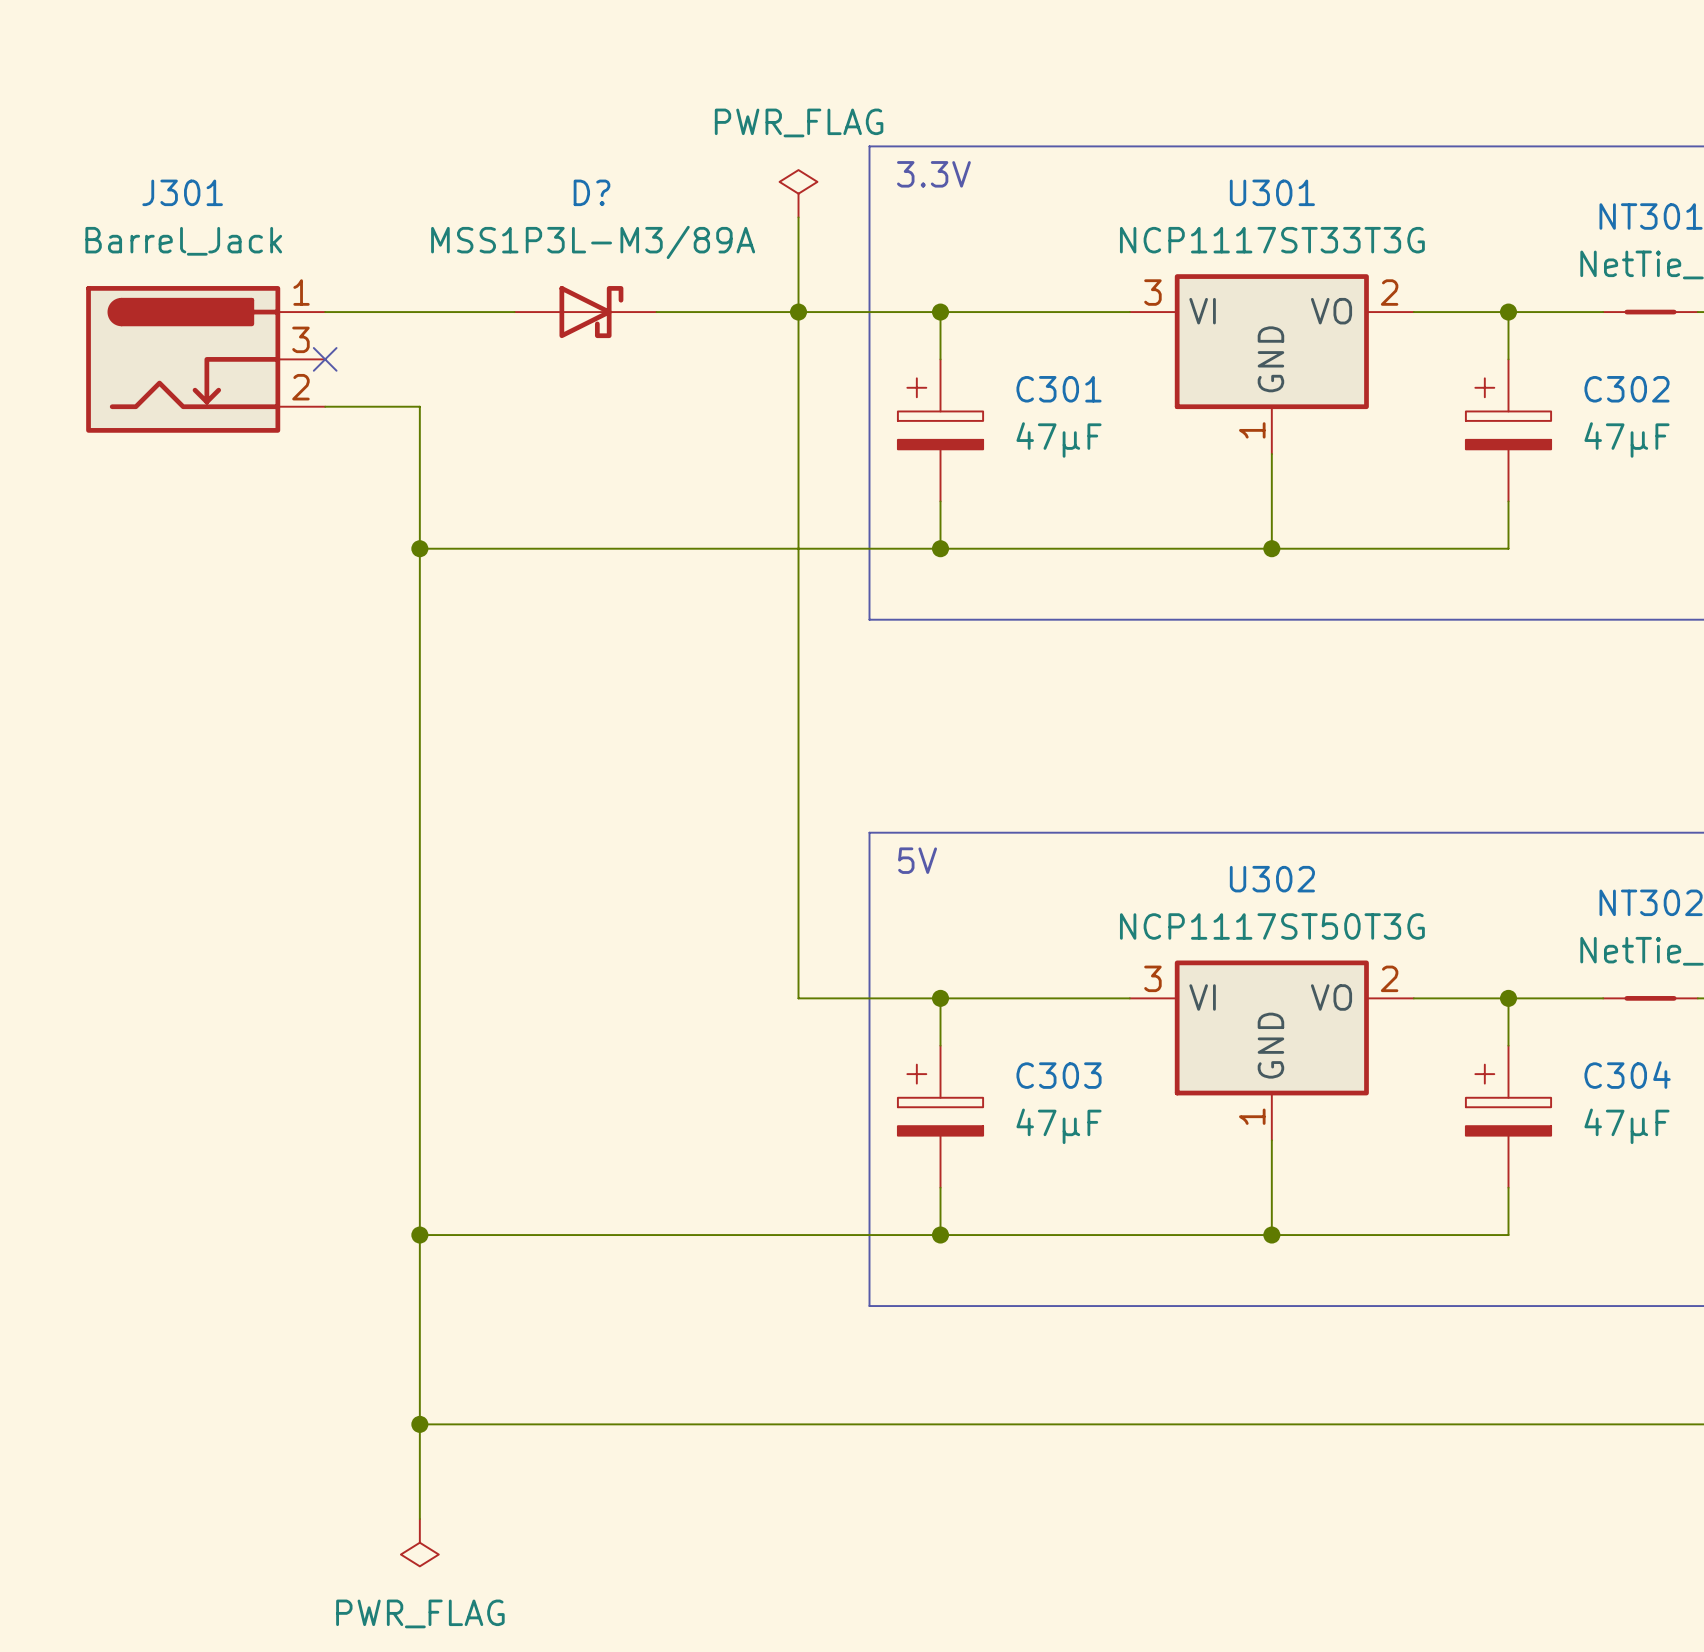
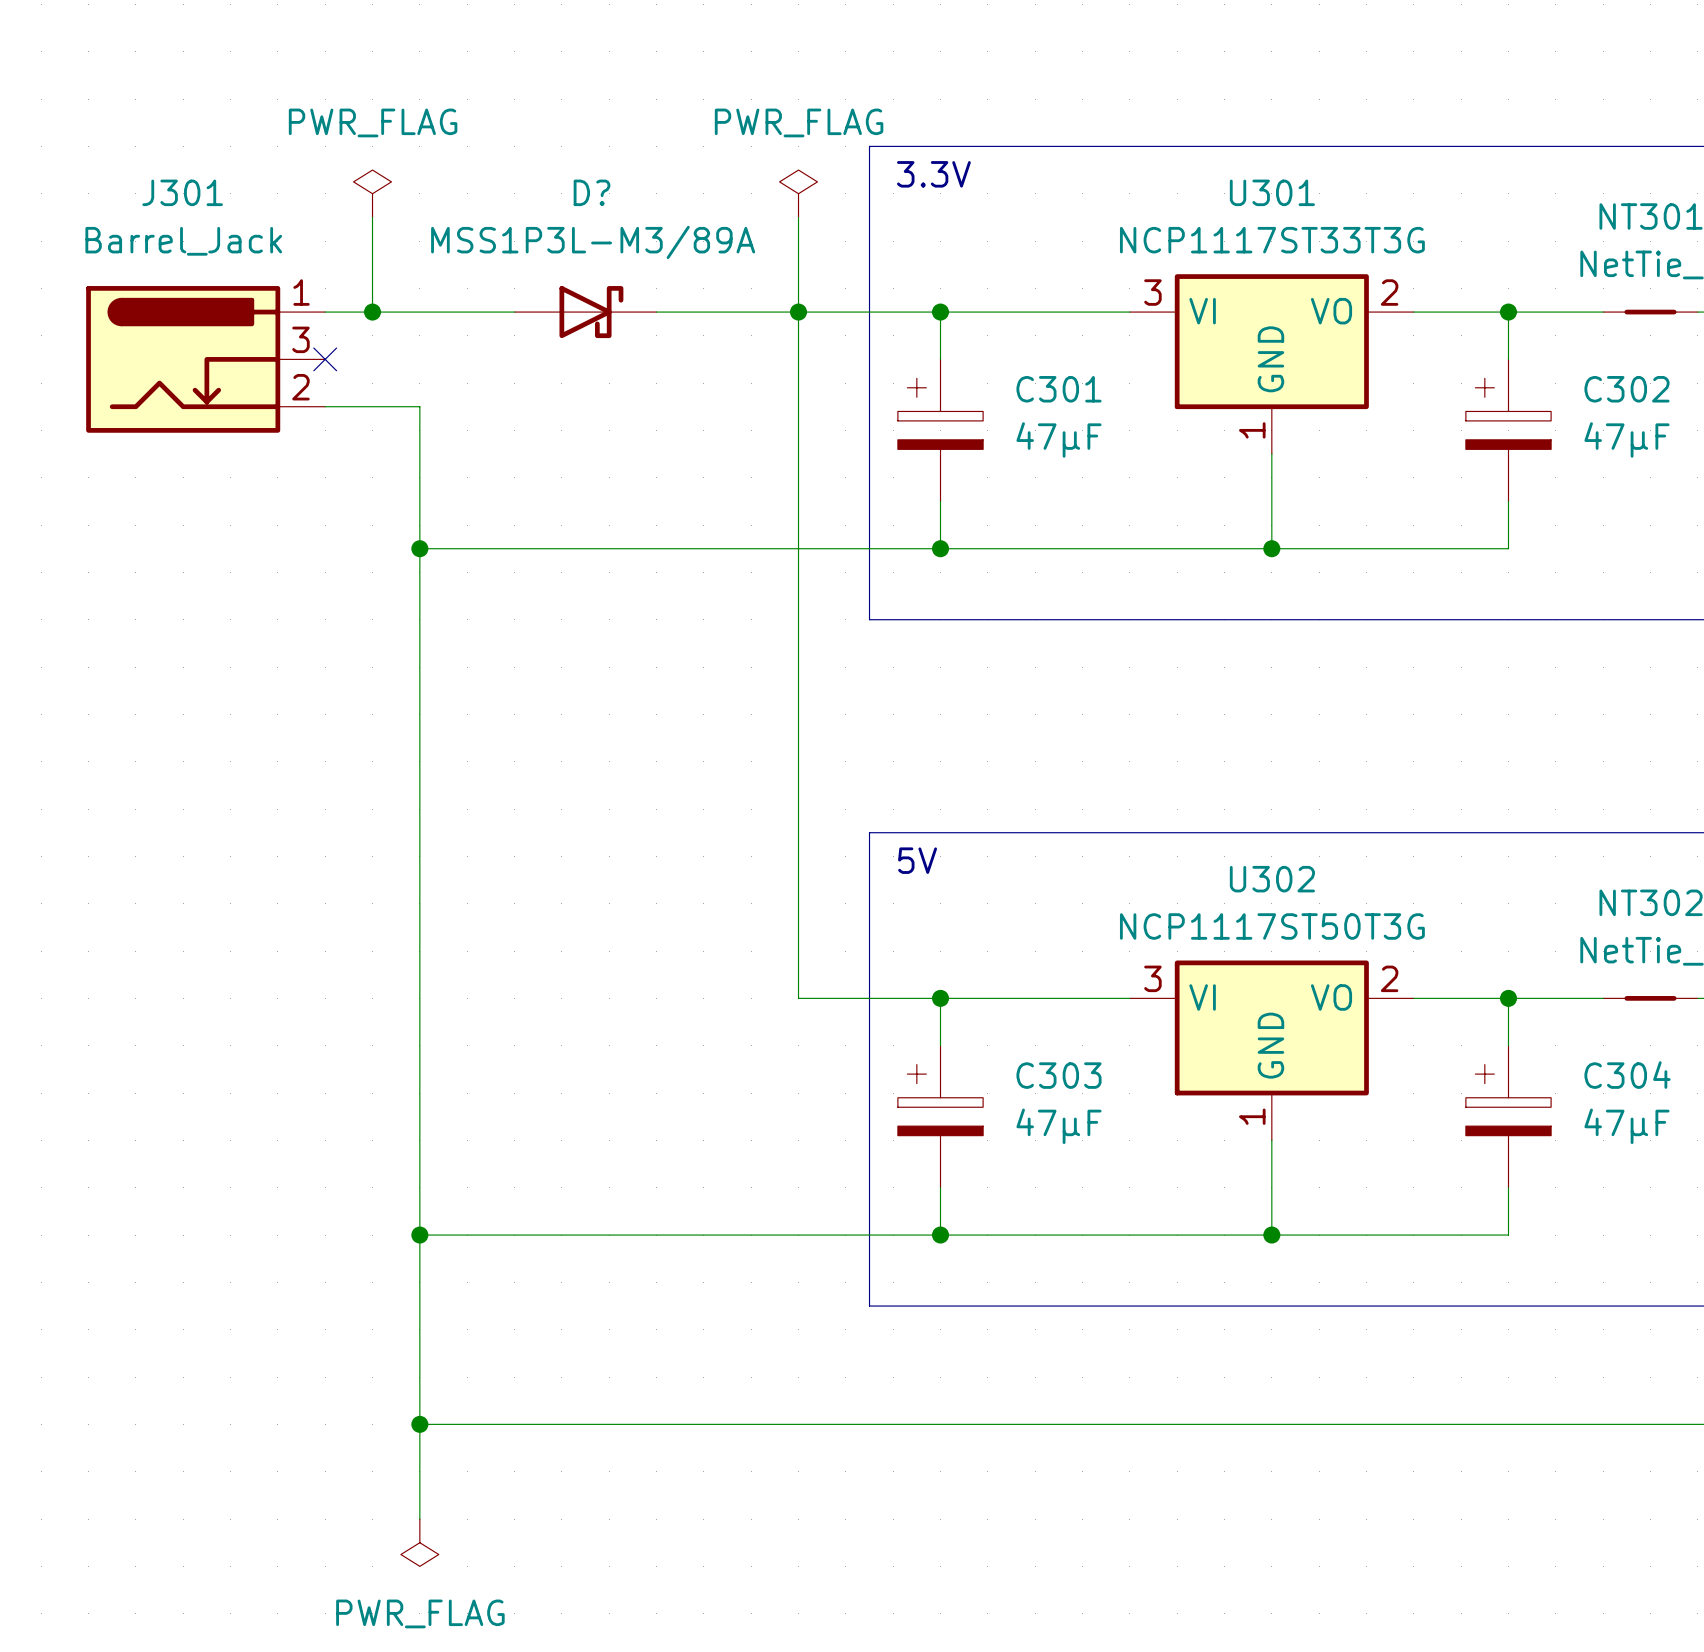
power symbol: none -> PWR_FLAG (372, 193)
wire: none -> (372, 217) (372, 312)
junction: none -> (372, 312)

